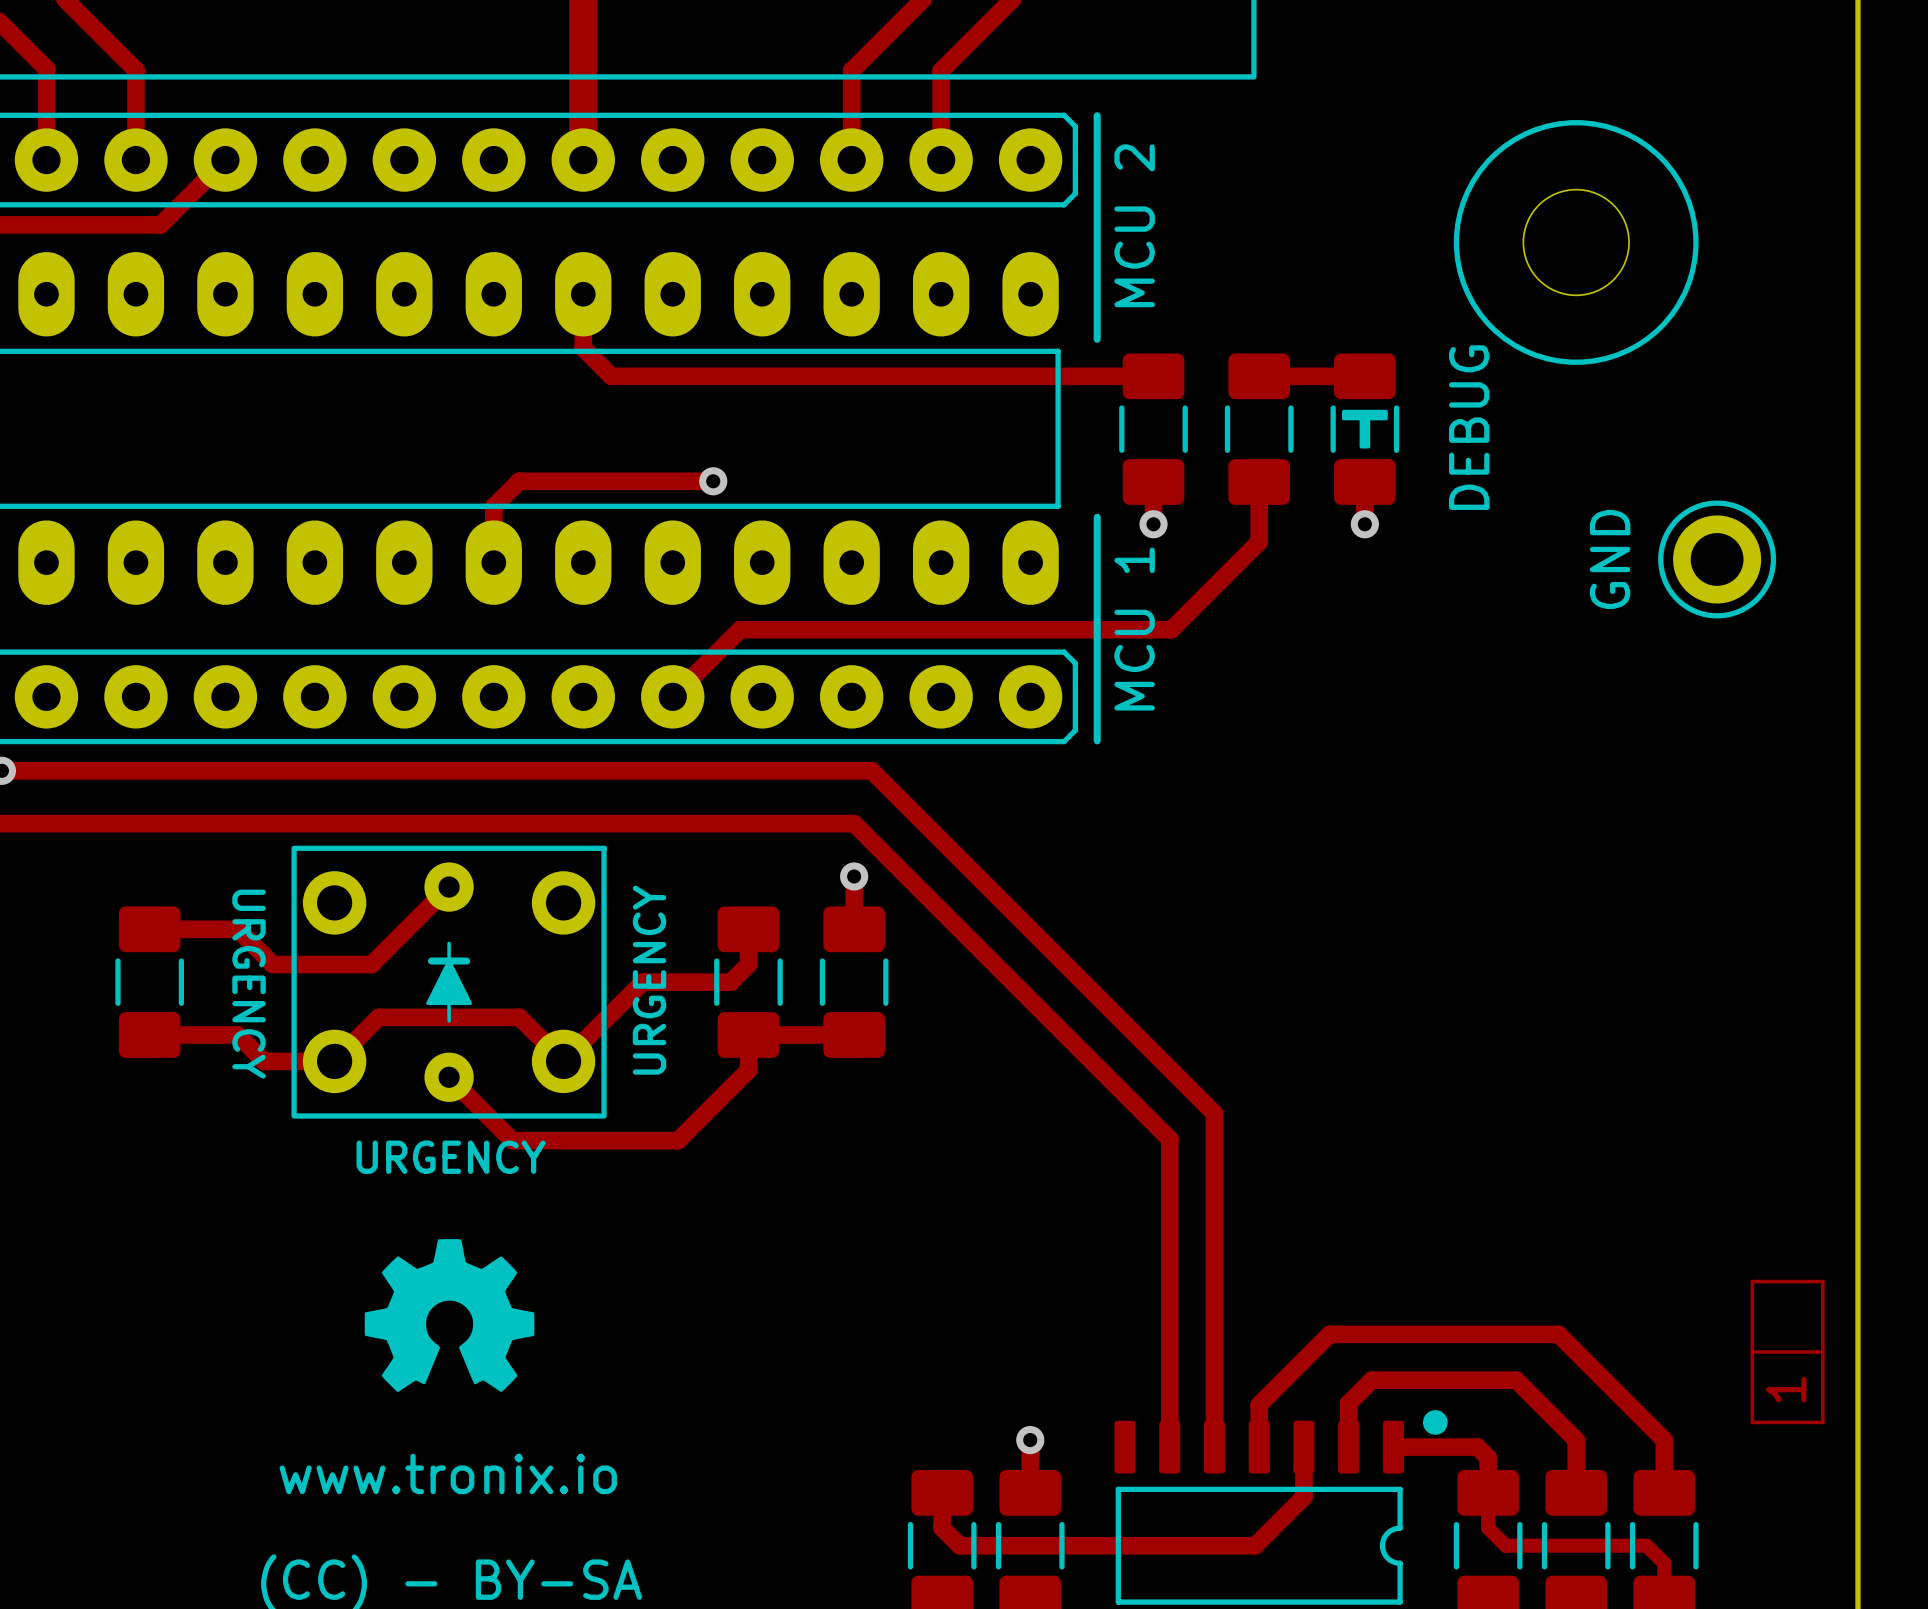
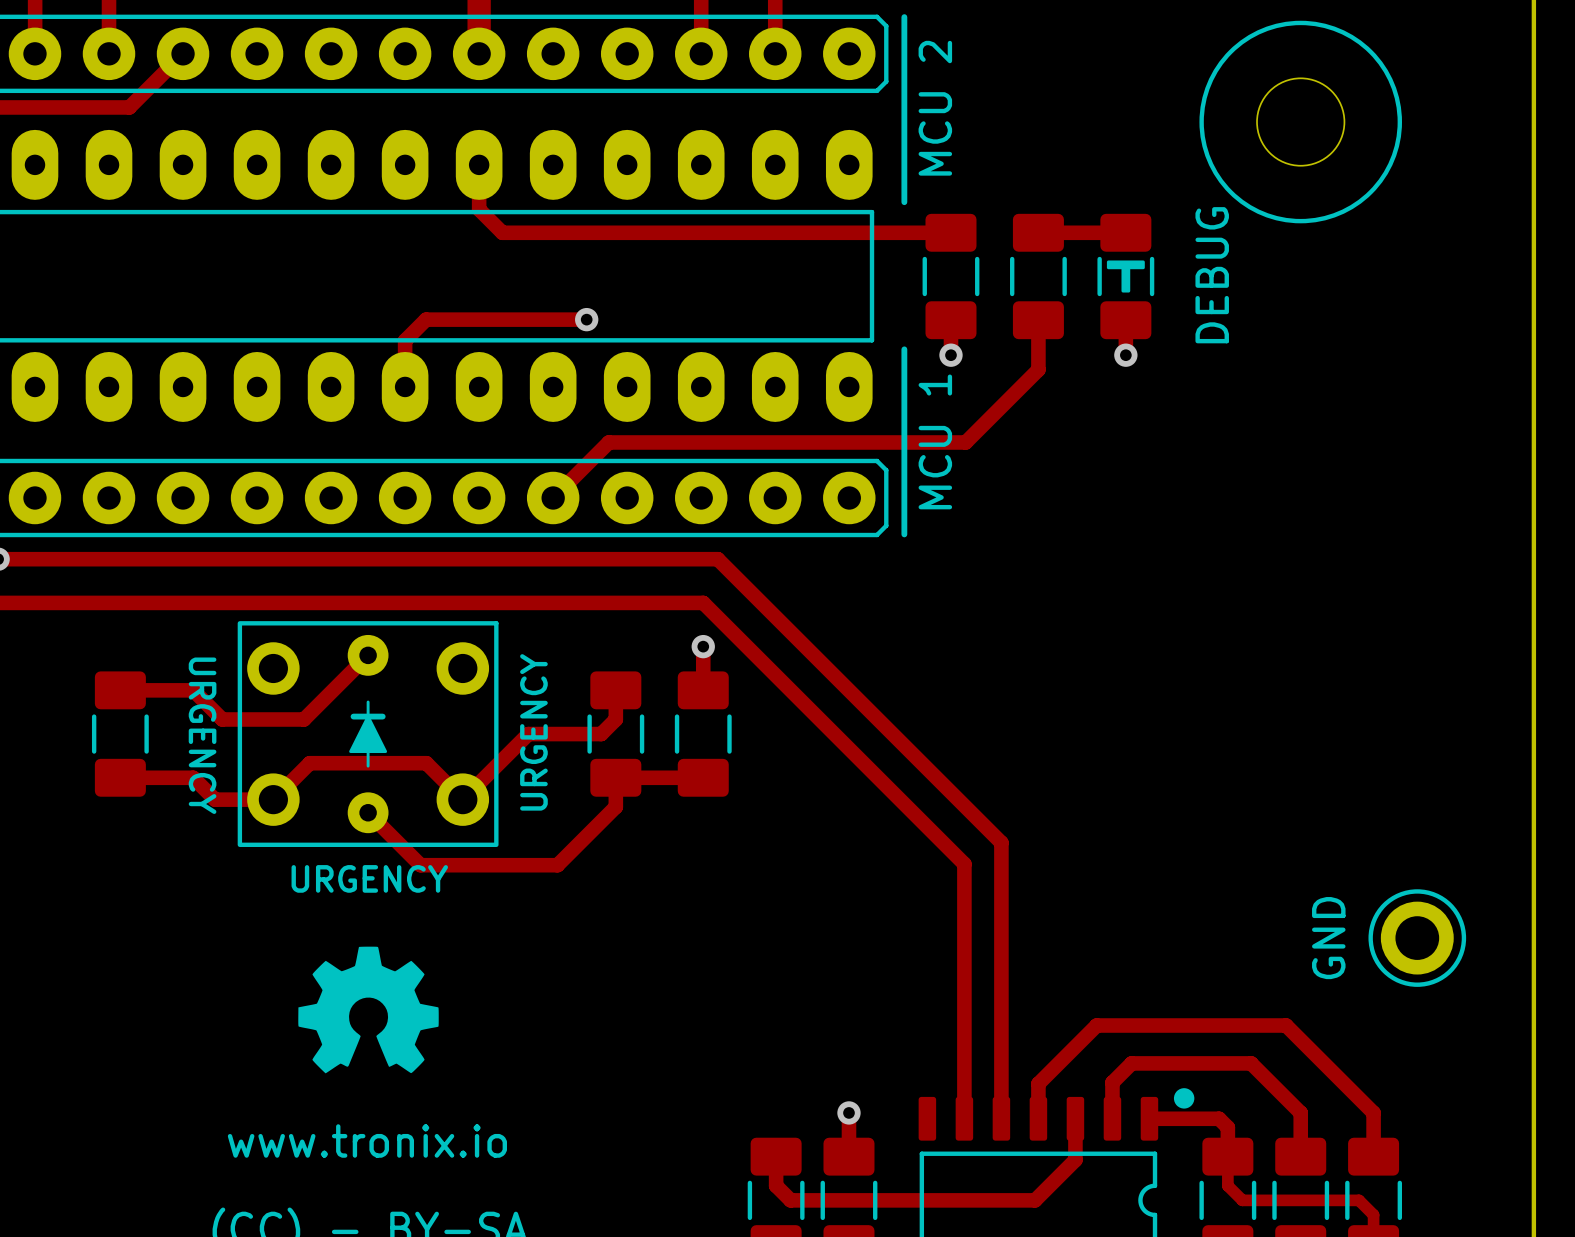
text position: GND (1610, 559) -> GND (1328, 938)
part position: (1717, 559) -> (1417, 938)
track: (1752, 1281) (1752, 1422) (1822, 1422) (1822, 1281) (1752, 1281) -> none
track: (1752, 1352) (1822, 1352) -> none
text: 1 (1786, 1389) -> none

